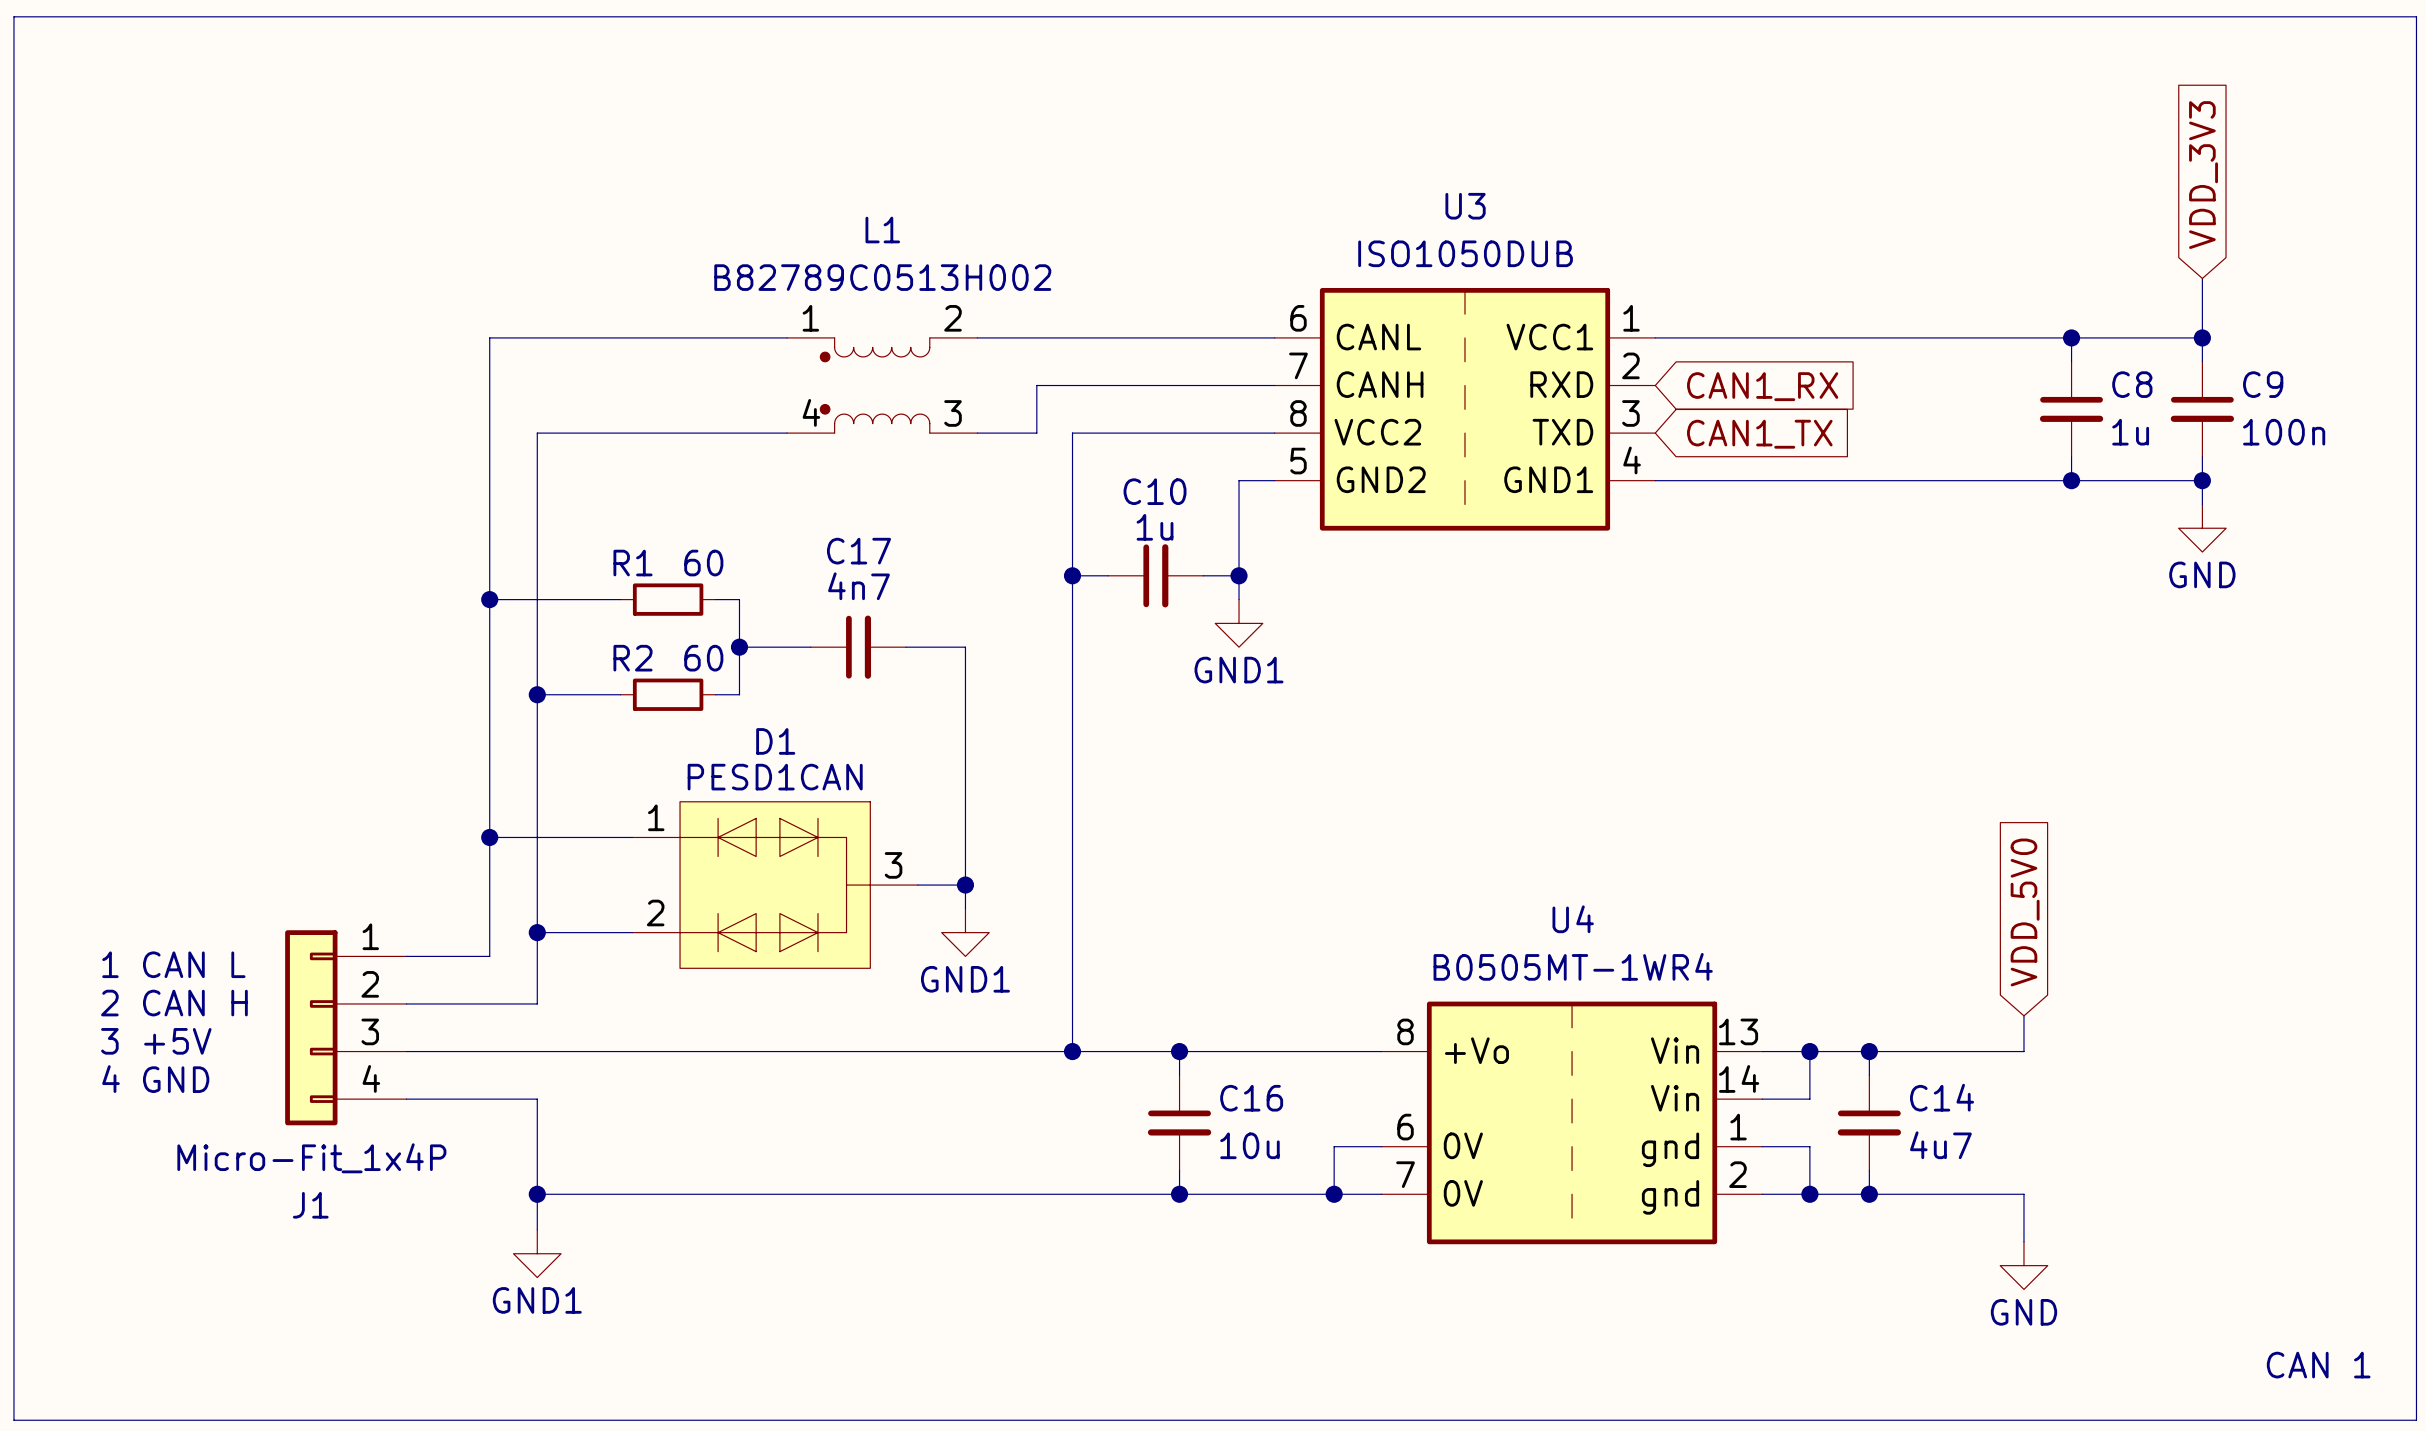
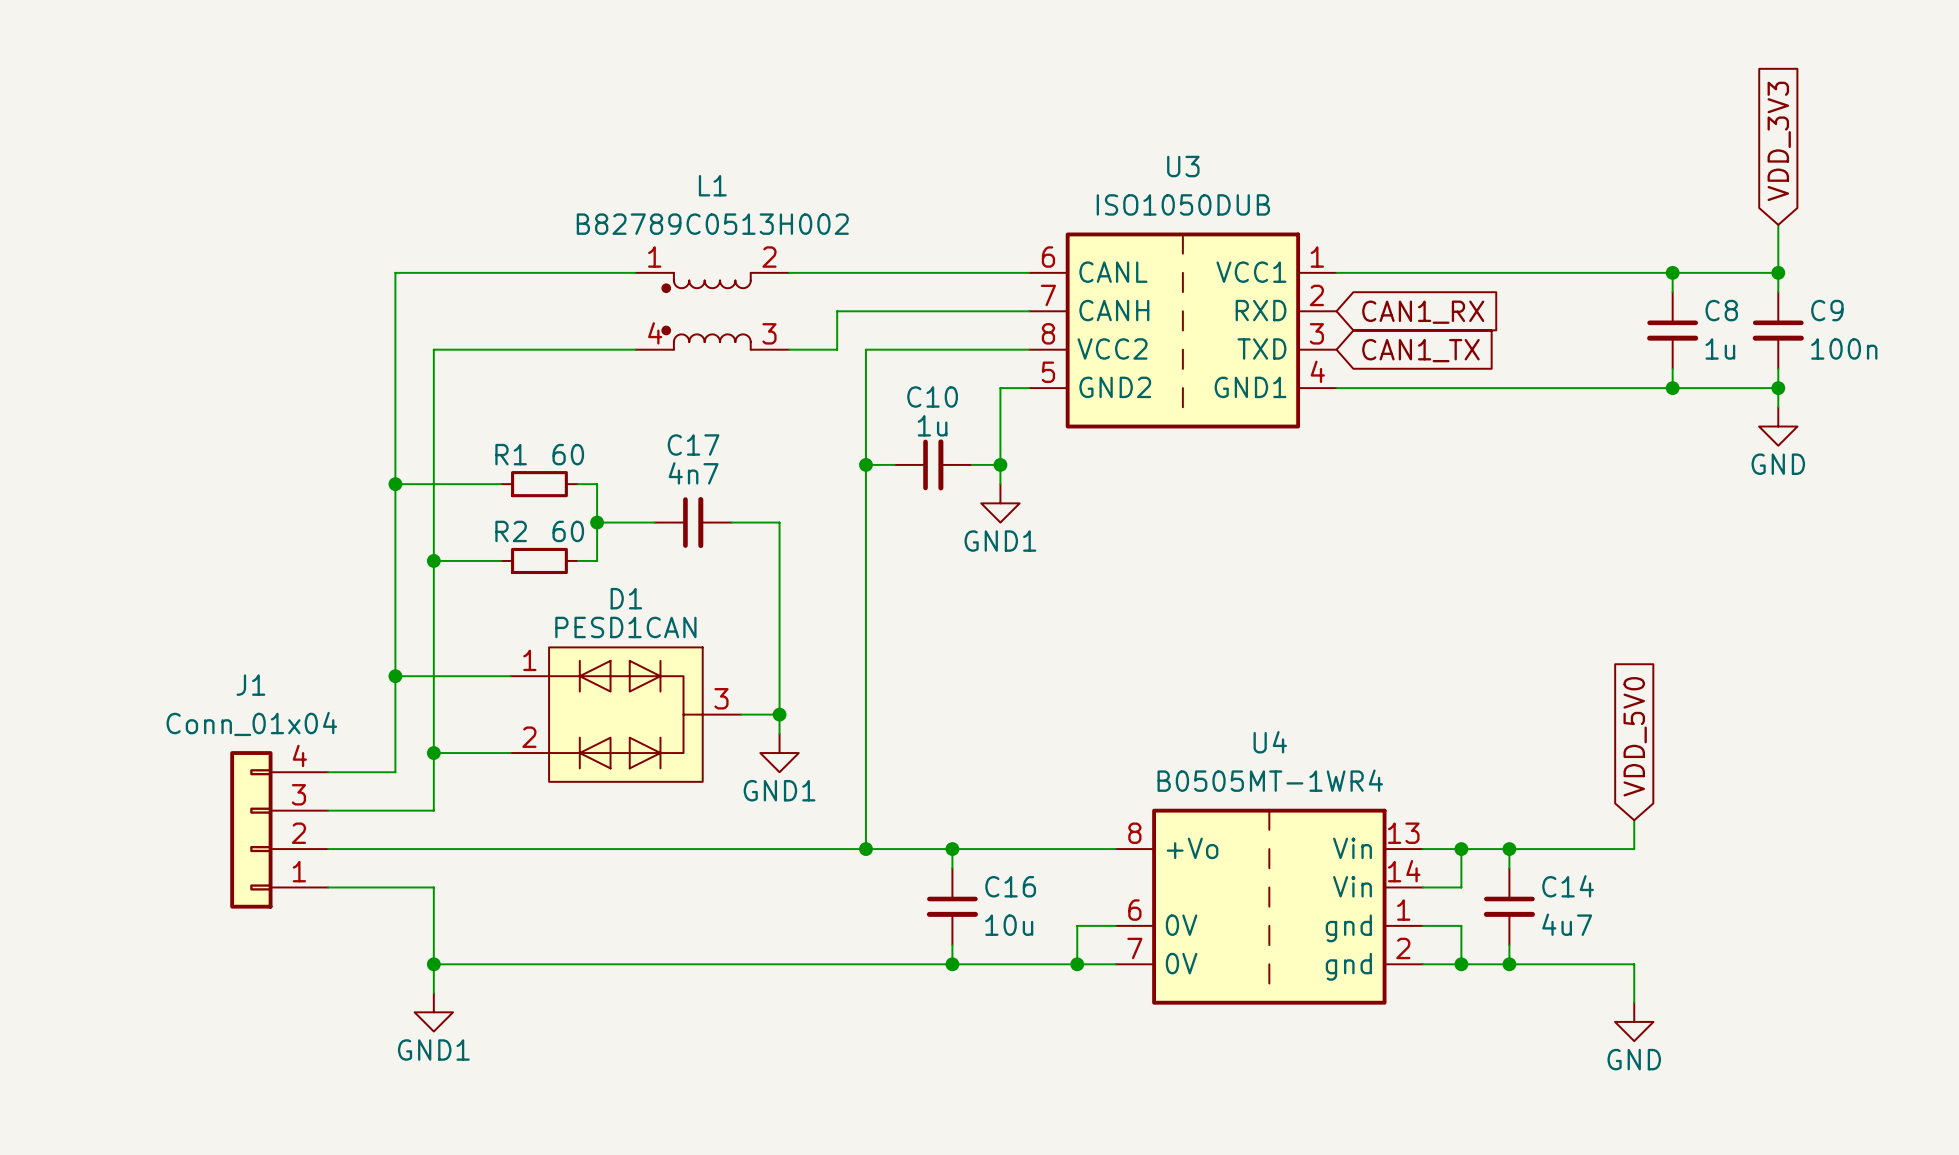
line: (13, 16) (2416, 16) (2416, 1420) (13, 1420) (13, 16) -> none
text: 1 CAN L (173, 964) -> none
text: 2 CAN H (174, 1003) -> none
J1 flip: as is (311, 1027) -> up-down (251, 829)
text: 3 +5V (156, 1041) -> none
text: 4 GND (155, 1079) -> none
J1 value: Micro-Fit_1x4P (311, 1158) -> Conn_01x04 (251, 723)
text: CAN 1 (2318, 1365) -> none

